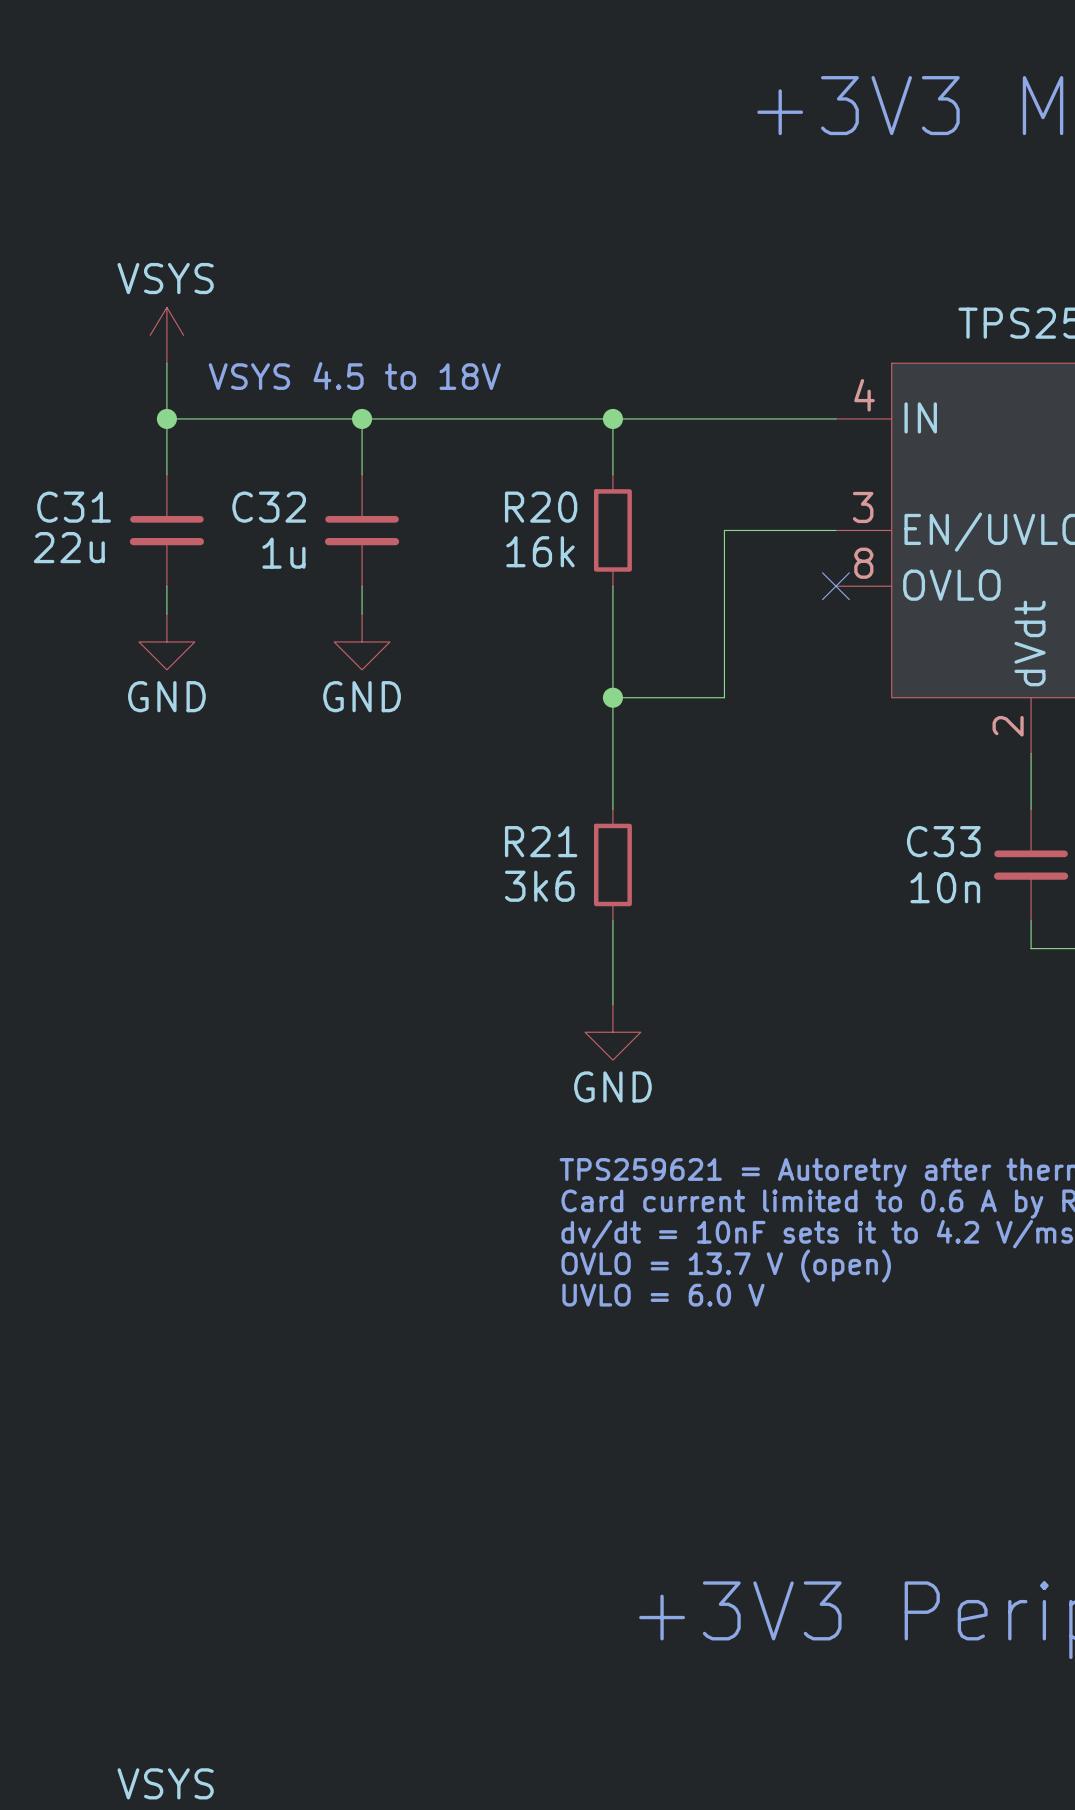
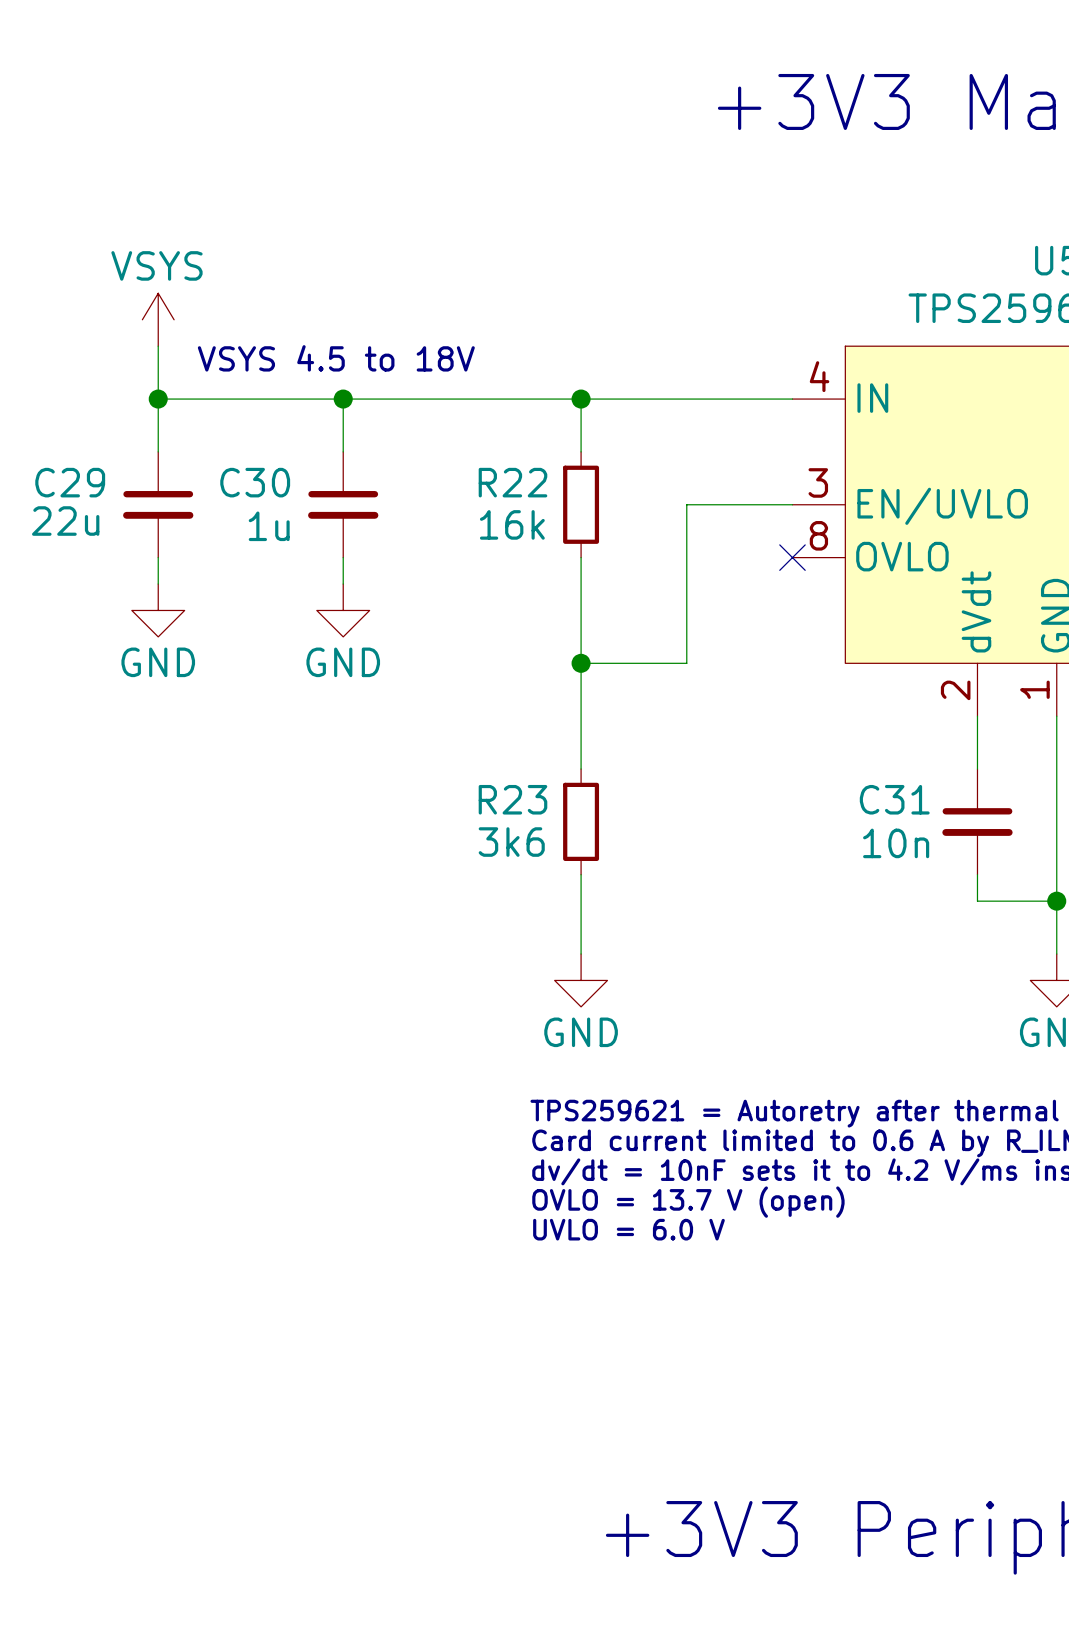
C31 name: C31 (74, 507) -> C29 (70, 482)
C32 name: C32 (269, 507) -> C30 (255, 482)
R20 name: R20 (541, 507) -> R22 (512, 482)
R21 name: R21 (541, 841) -> R23 (512, 799)
C33 name: C33 (943, 841) -> C31 (894, 799)

